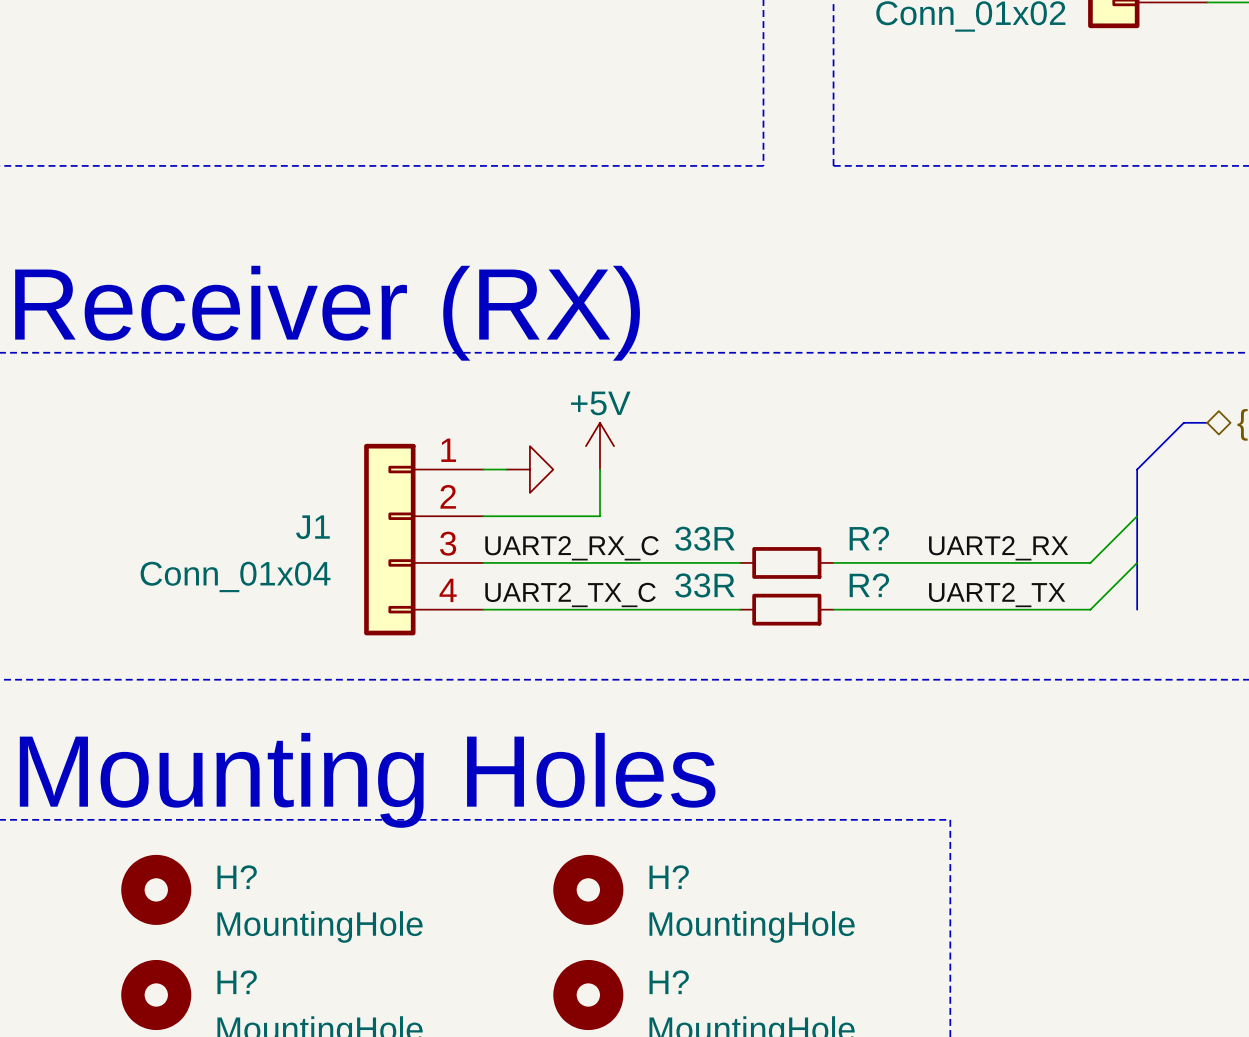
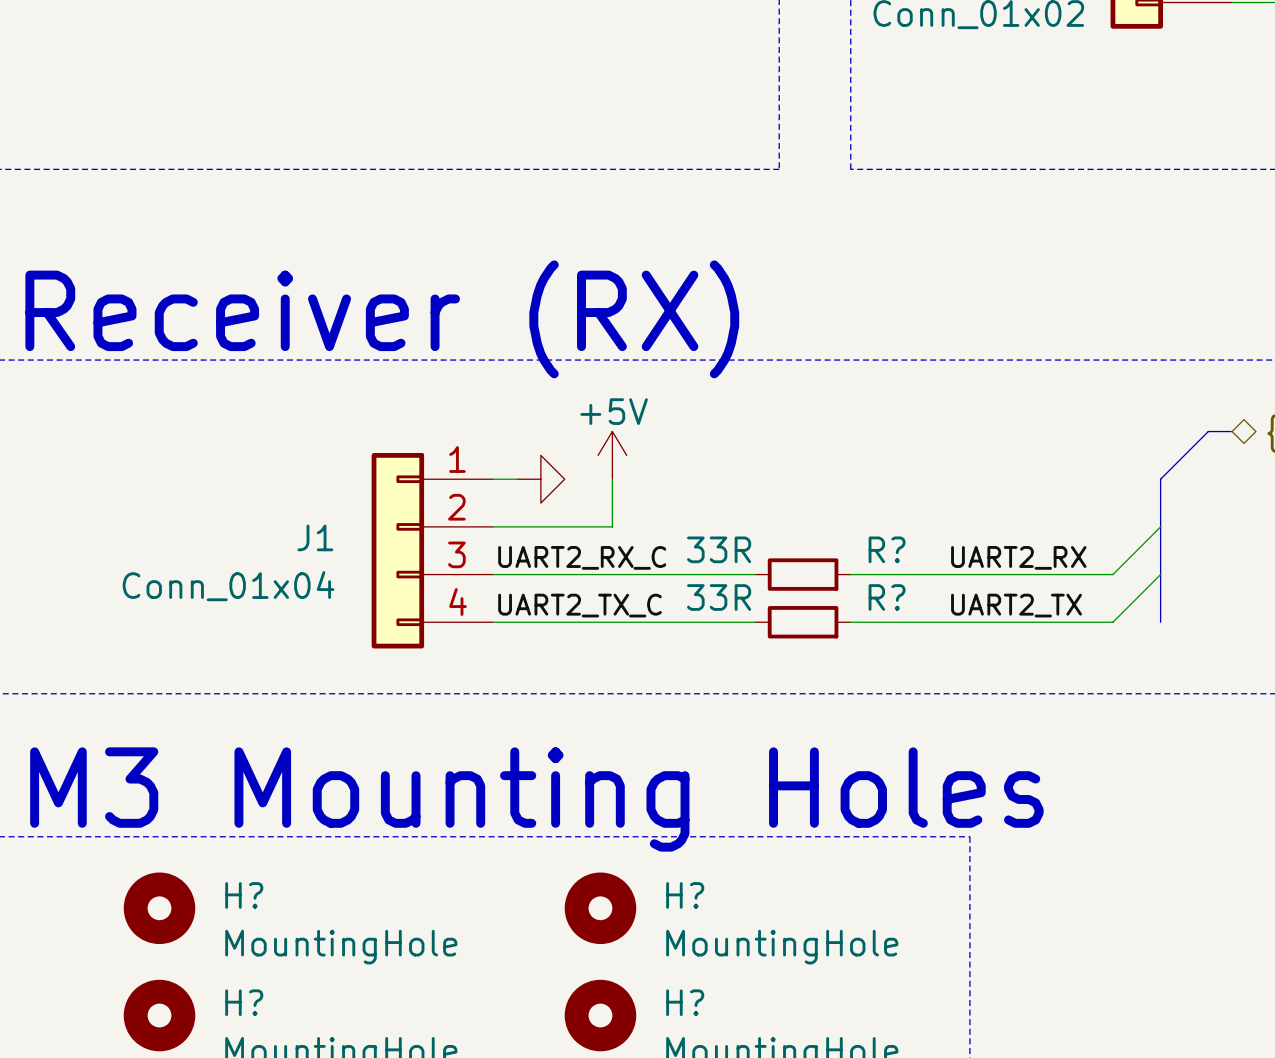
text: Mounting Holes (367, 780) -> M3 Mounting Holes (536, 799)

